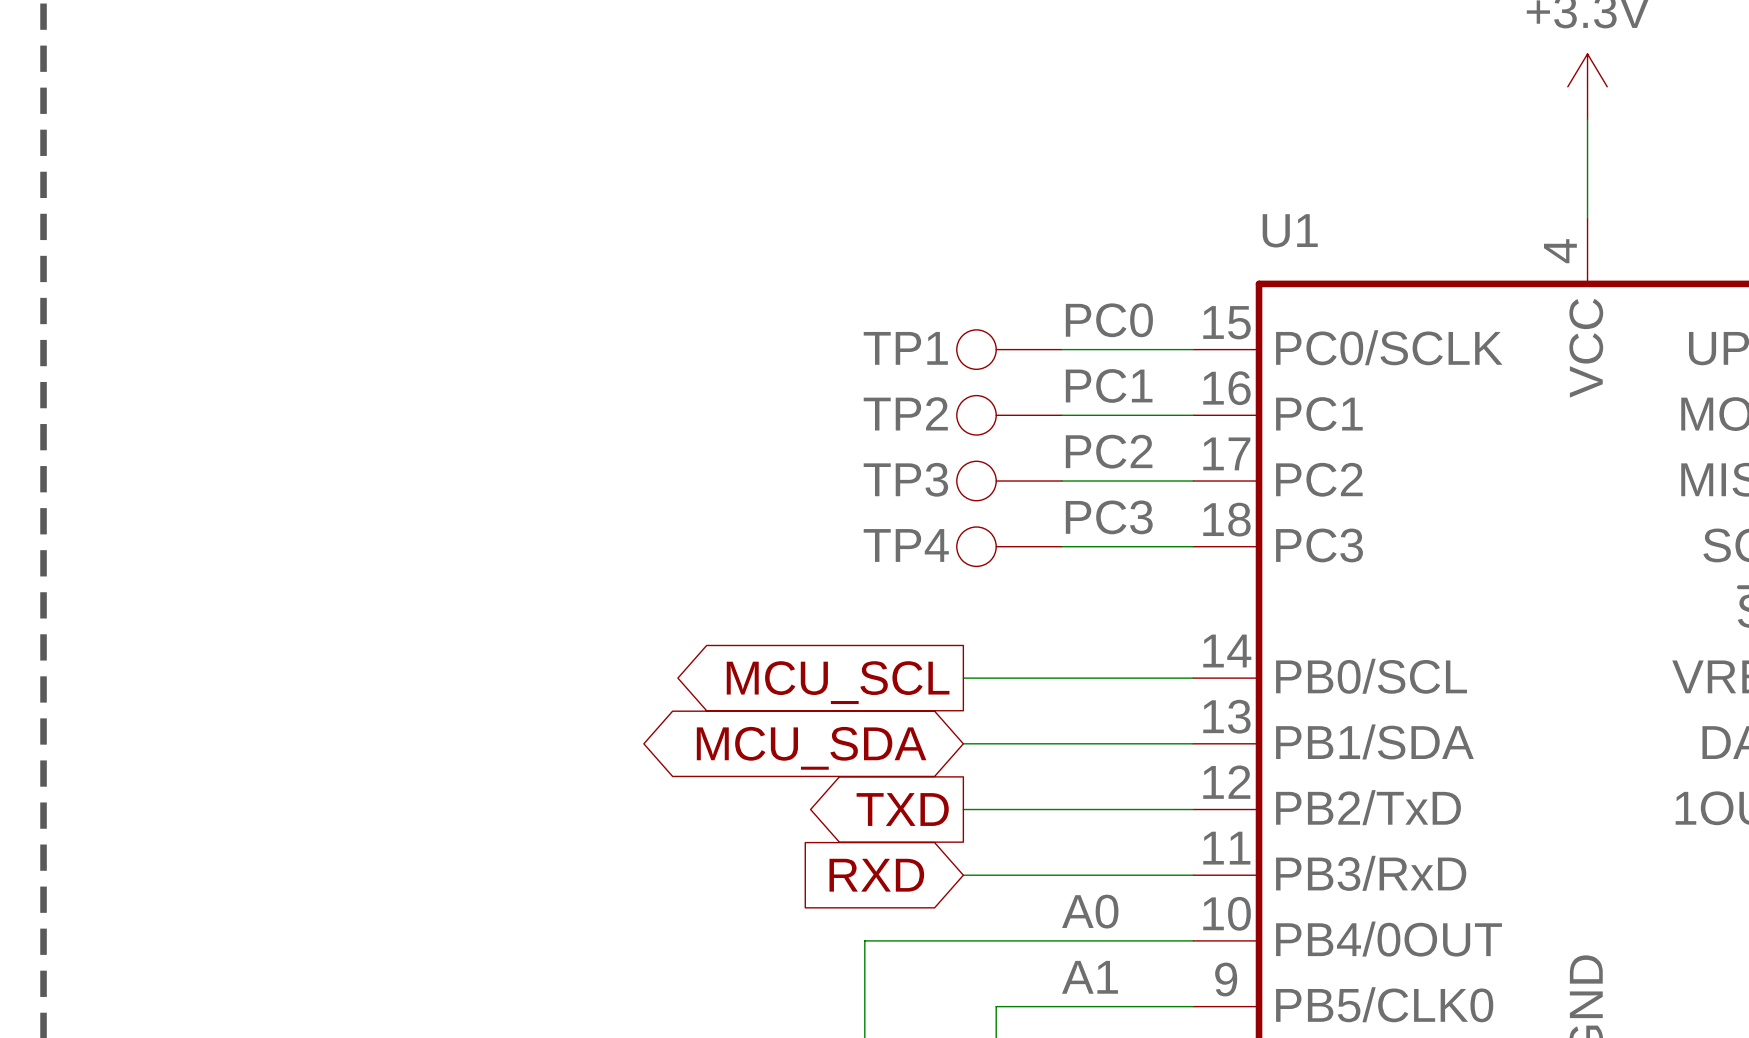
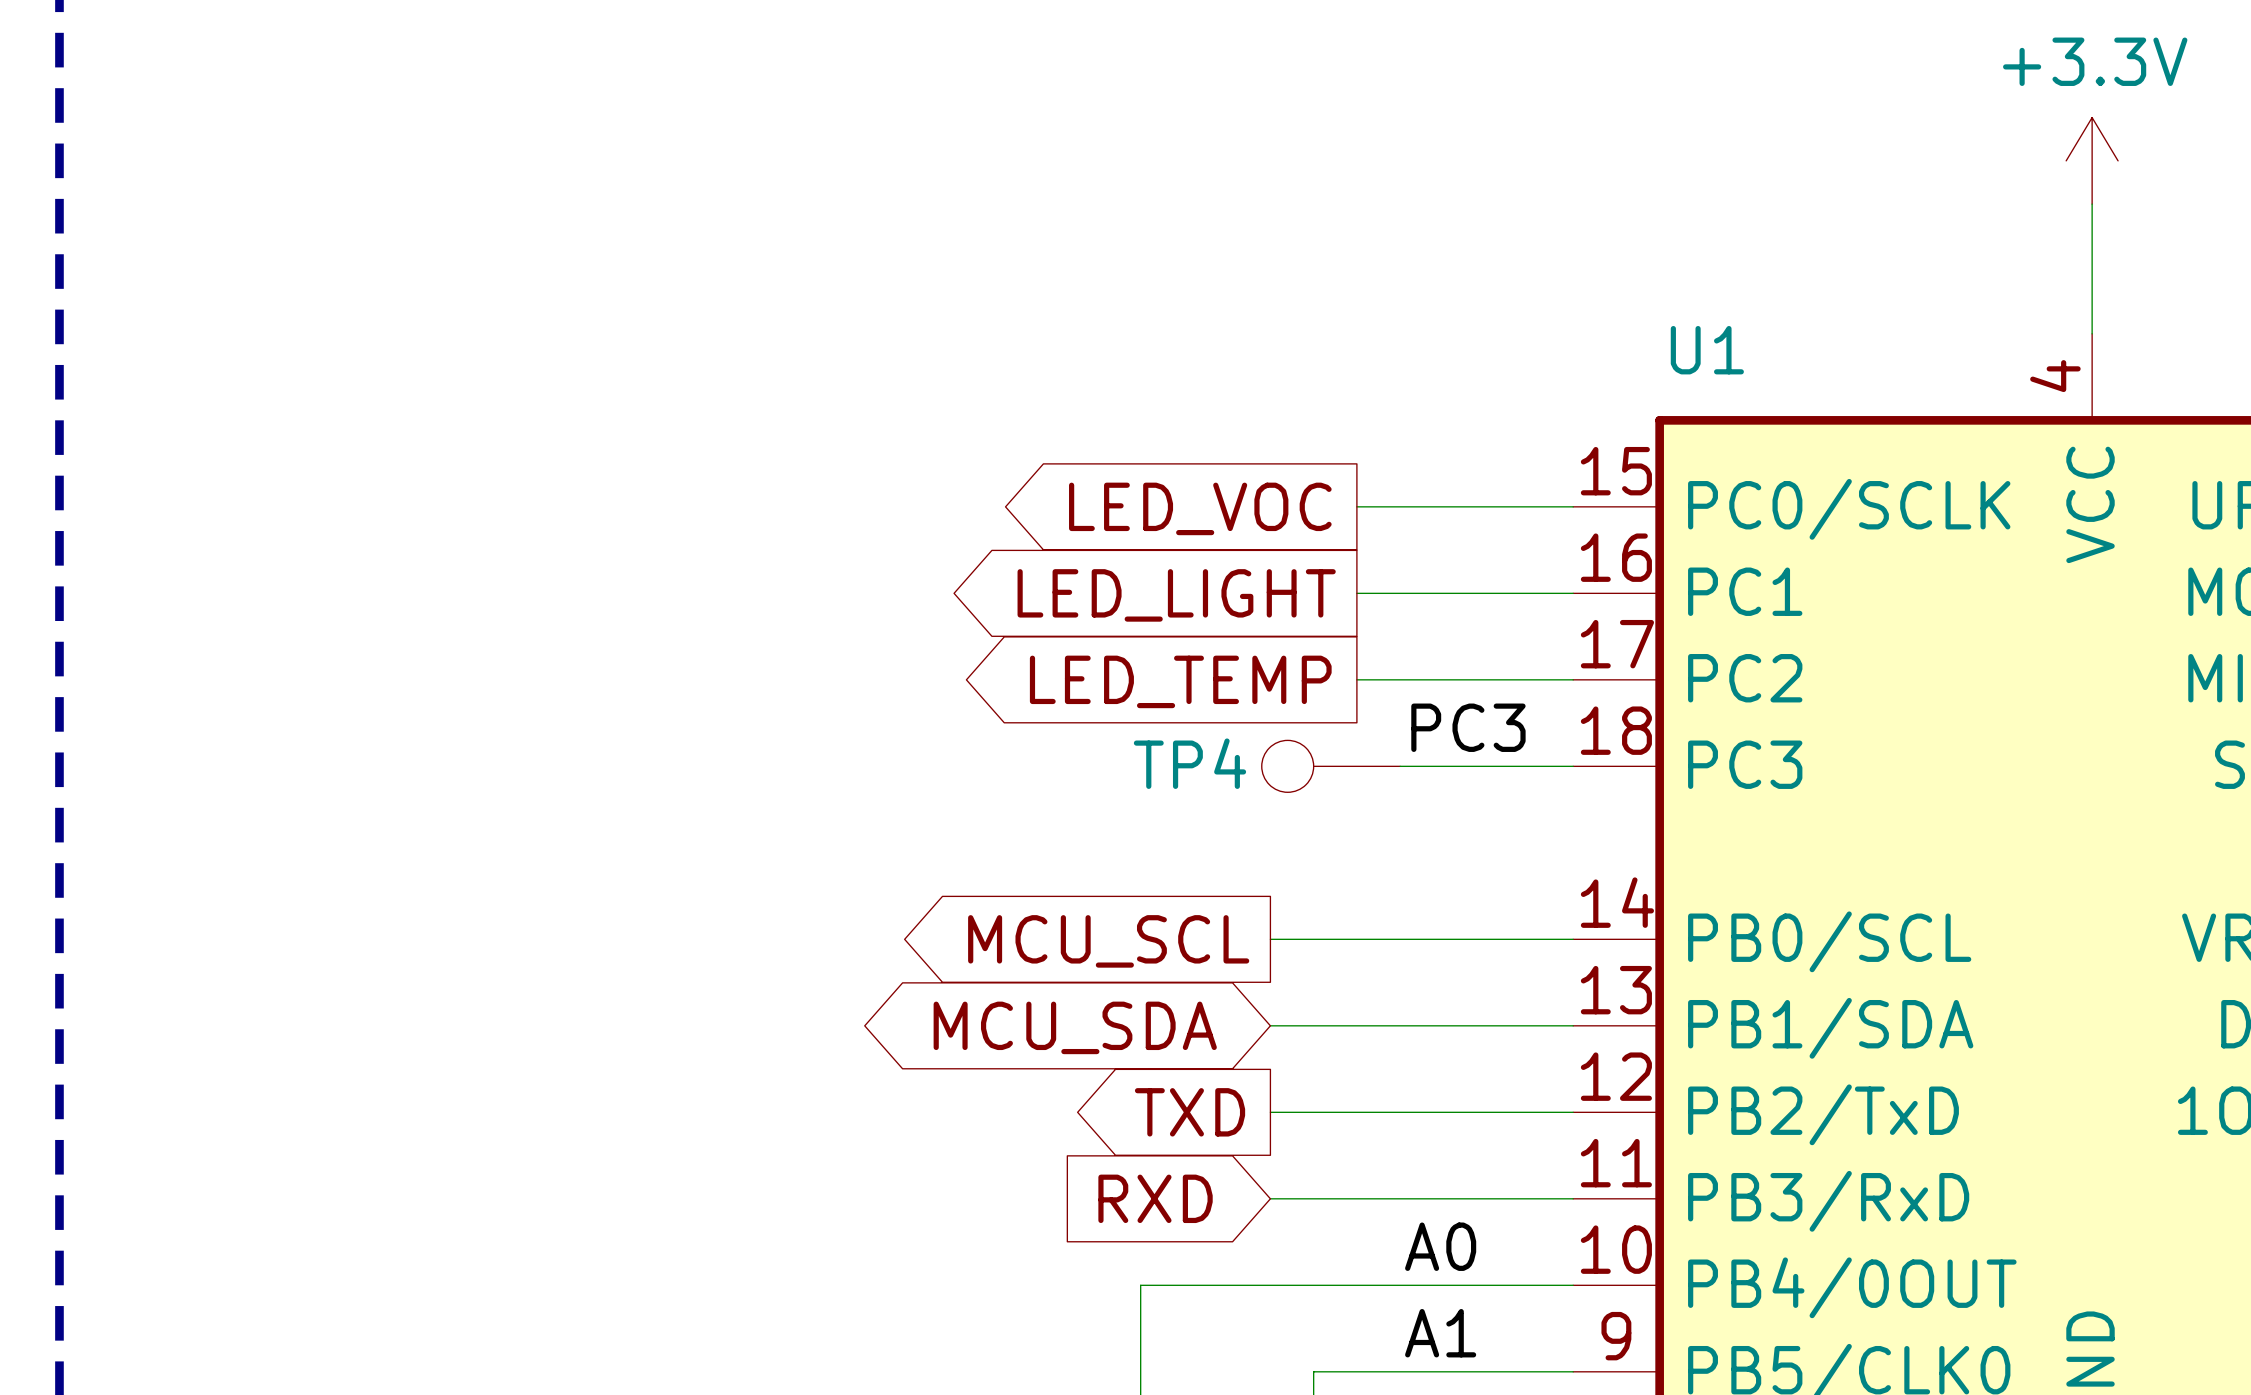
label: PC0 (1109, 320) -> none
TP1: (1009, 349) -> none
global label: none -> LED_VOC (1200, 508)
label: PC1 (1109, 385) -> none
TP2: (1009, 415) -> none
global label: none -> LED_LIGHT (1176, 595)
label: PC2 (1109, 451) -> none
TP3: (1009, 481) -> none
global label: none -> LED_TEMP (1180, 681)

